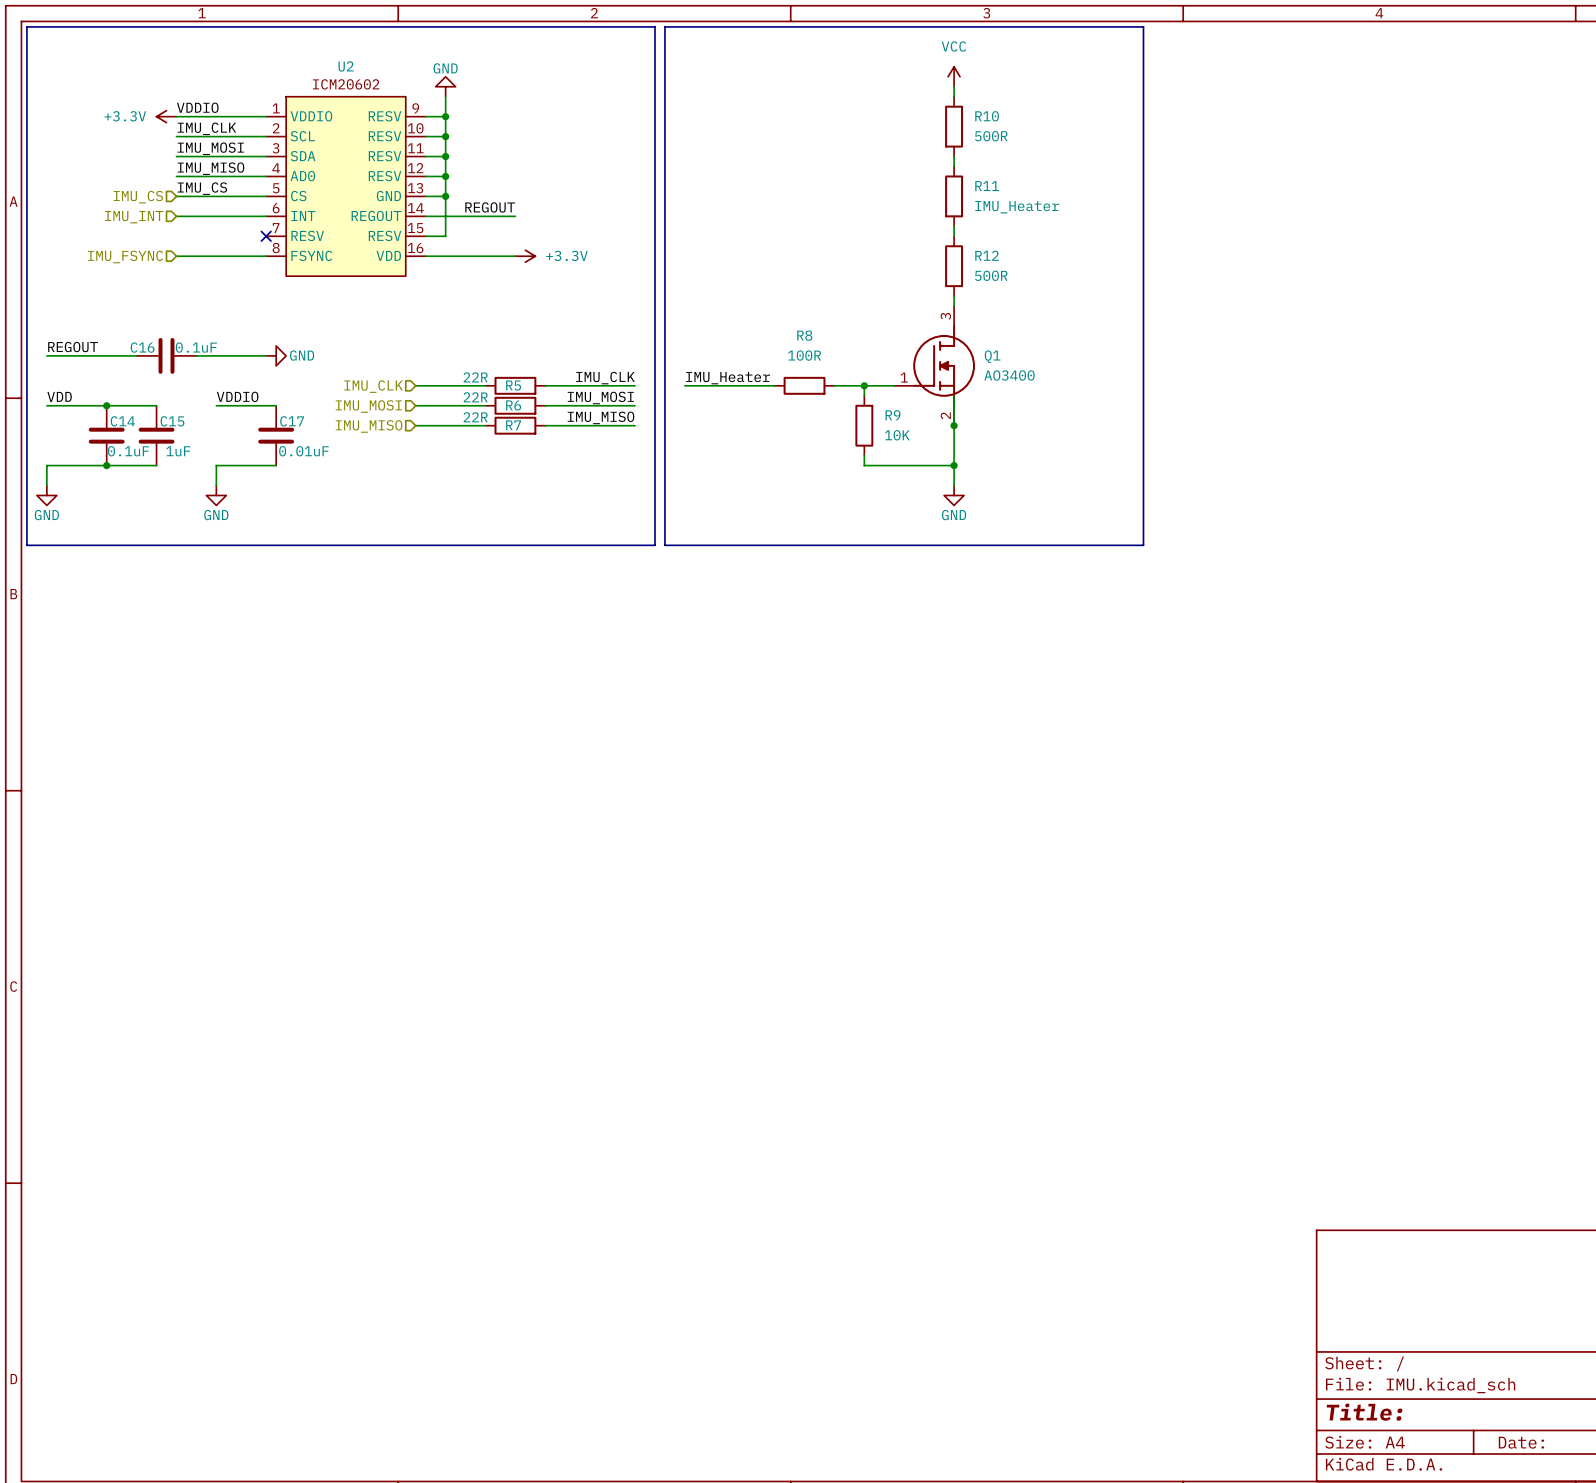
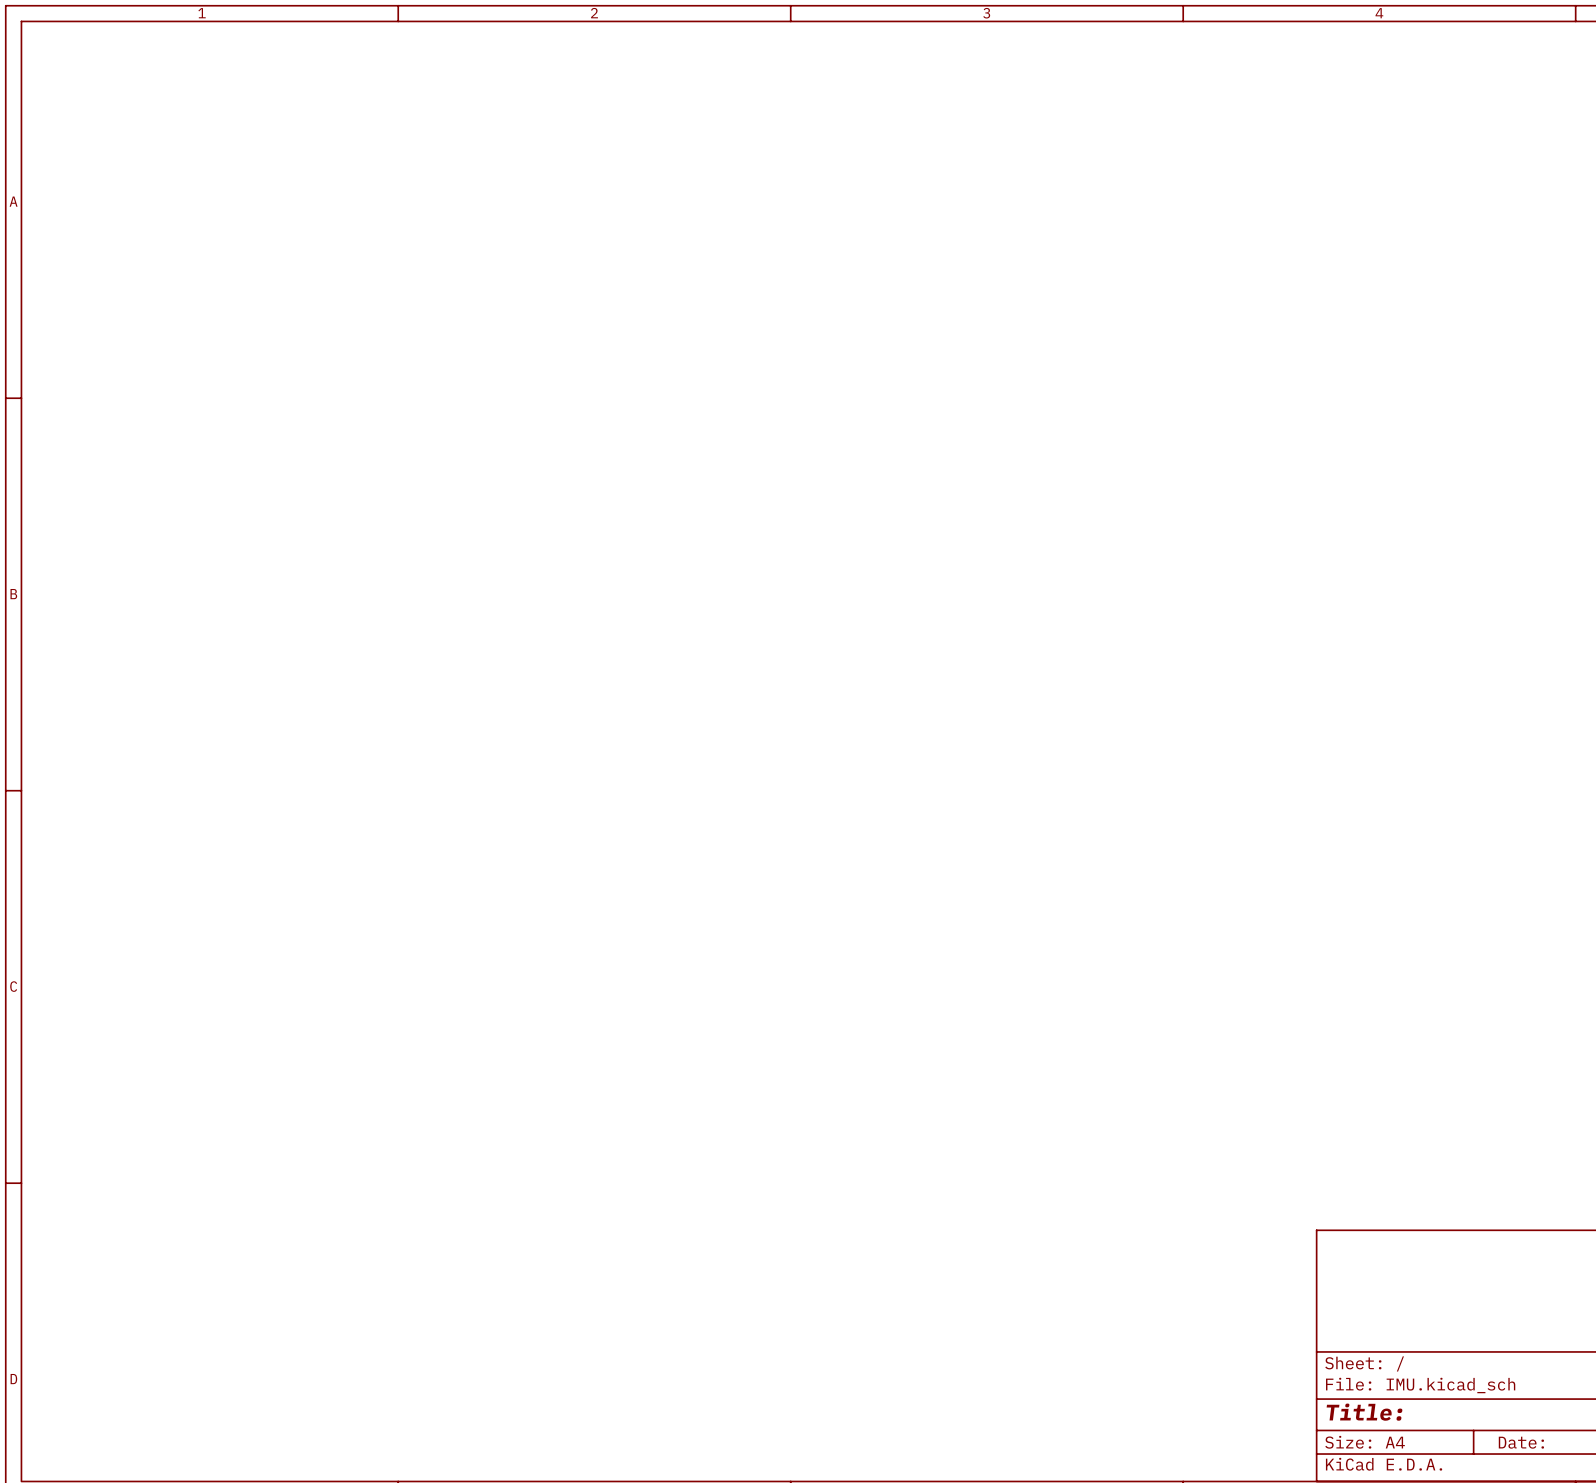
line: (26, 26) (654, 26) (654, 545) (26, 545) (26, 26) -> none
line: (664, 26) (1143, 26) (1143, 545) (664, 545) (664, 26) -> none
power symbol: VCC (954, 76) -> none
power symbol: GND (445, 86) -> none
wire: (954, 86) (954, 96) -> none
wire: (445, 96) (445, 236) (425, 236) -> none
label: VDDIO (197, 107) -> none
power symbol: +3.3V (166, 116) -> none
wire: (176, 116) (266, 116) -> none
wire: (425, 116) (445, 116) -> none
junction: (445, 116) -> none
R10: 500R (954, 126) -> none
label: IMU_CLK (206, 128) -> none
wire: (176, 136) (266, 136) -> none
wire: (425, 136) (445, 136) -> none
junction: (445, 136) -> none
label: IMU_MOSI (210, 148) -> none
wire: (176, 156) (266, 156) -> none
wire: (425, 156) (445, 156) -> none
junction: (445, 156) -> none
wire: (954, 156) (954, 166) -> none
label: IMU_MISO (210, 168) -> none
wire: (176, 176) (266, 176) -> none
wire: (425, 176) (445, 176) -> none
junction: (445, 176) -> none
U2: (345, 186) -> none
label: IMU_CS (202, 188) -> none
wire: (176, 196) (266, 196) -> none
wire: (425, 196) (445, 196) -> none
junction: (445, 196) -> none
R11: IMU_Heater (954, 196) -> none
hierarchical label: IMU_CS (138, 197) -> none
label: REGOUT (490, 207) -> none
wire: (176, 216) (266, 216) -> none
wire: (425, 216) (515, 216) -> none
hierarchical label: IMU_INT (134, 217) -> none
wire: (954, 226) (954, 236) -> none
no-connect mark: (266, 236) -> none
hierarchical label: IMU_FSYNC (125, 256) -> none
wire: (176, 256) (266, 256) -> none
wire: (425, 256) (515, 256) -> none
power symbol: +3.3V (525, 256) -> none
R12: 500R (954, 266) -> none
wire: (954, 296) (954, 306) -> none
label: REGOUT (73, 347) -> none
wire: (46, 355) (136, 355) -> none
C16: 0.1uF (166, 355) -> none
wire: (196, 355) (266, 355) -> none
power symbol: GND (276, 355) -> none
Q1: AO3400 (934, 365) -> none
label: IMU_CLK (605, 378) -> none
label: IMU_Heater (728, 378) -> none
wire: (415, 385) (485, 385) -> none
R5: 22R (515, 385) -> none
wire: (545, 385) (635, 385) -> none
wire: (684, 385) (774, 385) -> none
R8: 100R (804, 385) -> none
wire: (834, 385) (894, 385) -> none
wire: (864, 385) (864, 395) -> none
junction: (864, 385) -> none
hierarchical label: IMU_CLK (373, 386) -> none
wire: (954, 395) (954, 485) -> none
label: VDD (59, 396) -> none
label: VDDIO (237, 396) -> none
label: IMU_MOSI (600, 397) -> none
wire: (46, 405) (156, 405) -> none
junction: (106, 405) -> none
wire: (216, 405) (276, 405) -> none
wire: (415, 405) (485, 405) -> none
R6: 22R (515, 405) -> none
wire: (545, 405) (635, 405) -> none
hierarchical label: IMU_MOSI (368, 406) -> none
label: IMU_MISO (600, 417) -> none
wire: (415, 425) (485, 425) -> none
R7: 22R (515, 425) -> none
wire: (545, 425) (635, 425) -> none
R9: 10K (864, 425) -> none
junction: (954, 425) -> none
hierarchical label: IMU_MISO (368, 426) -> none
C14: 0.1uF (106, 435) -> none
C15: 1uF (156, 435) -> none
C17: 0.01uF (276, 435) -> none
wire: (864, 455) (864, 465) (954, 465) -> none
junction: (106, 465) -> none
wire: (156, 465) (46, 465) (46, 485) -> none
wire: (276, 465) (216, 465) (216, 485) -> none
junction: (954, 465) -> none
power symbol: GND (46, 495) -> none
power symbol: GND (216, 495) -> none
power symbol: GND (954, 495) -> none

